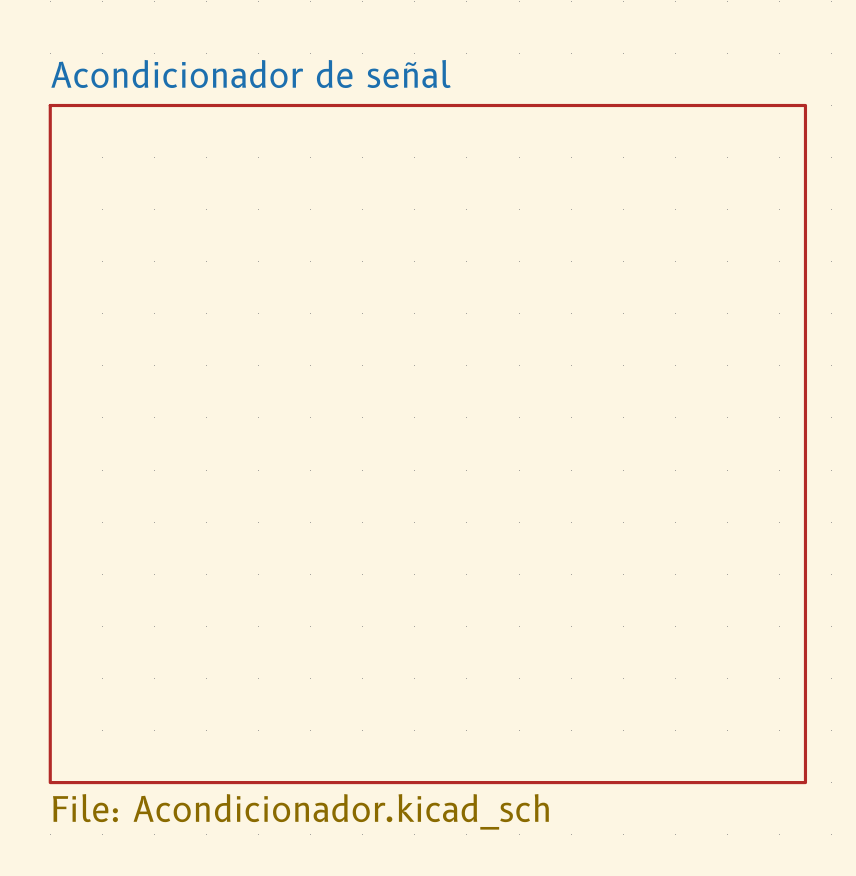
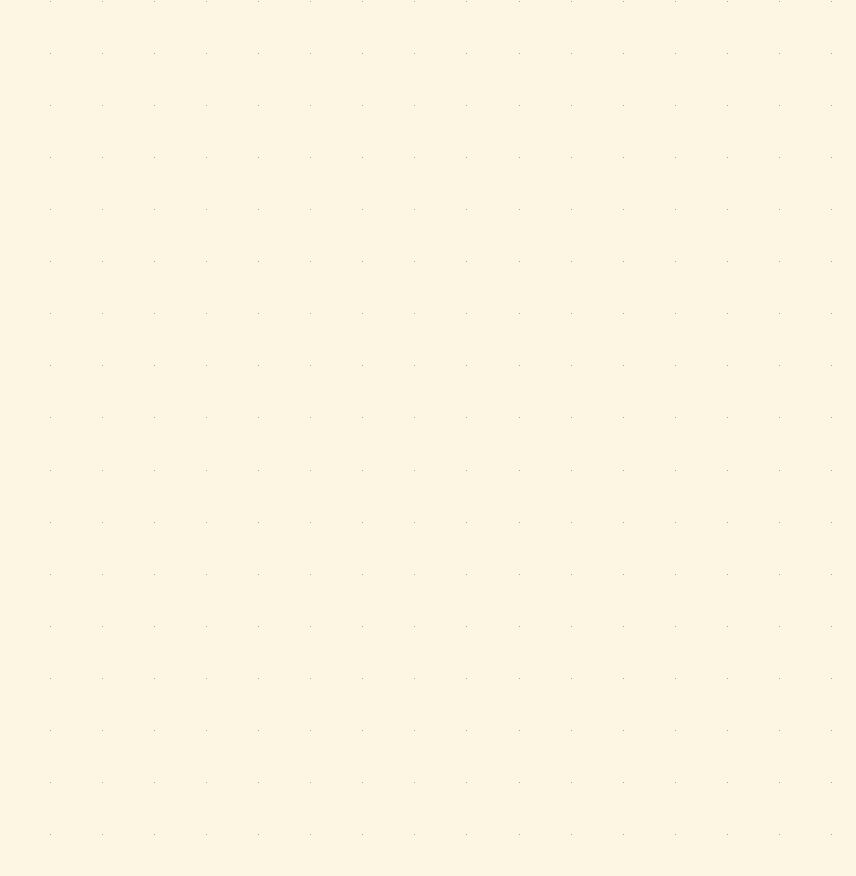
sheet Acondicionador de señal: File: Acondicionador.kicad_sch (427, 444) -> none

